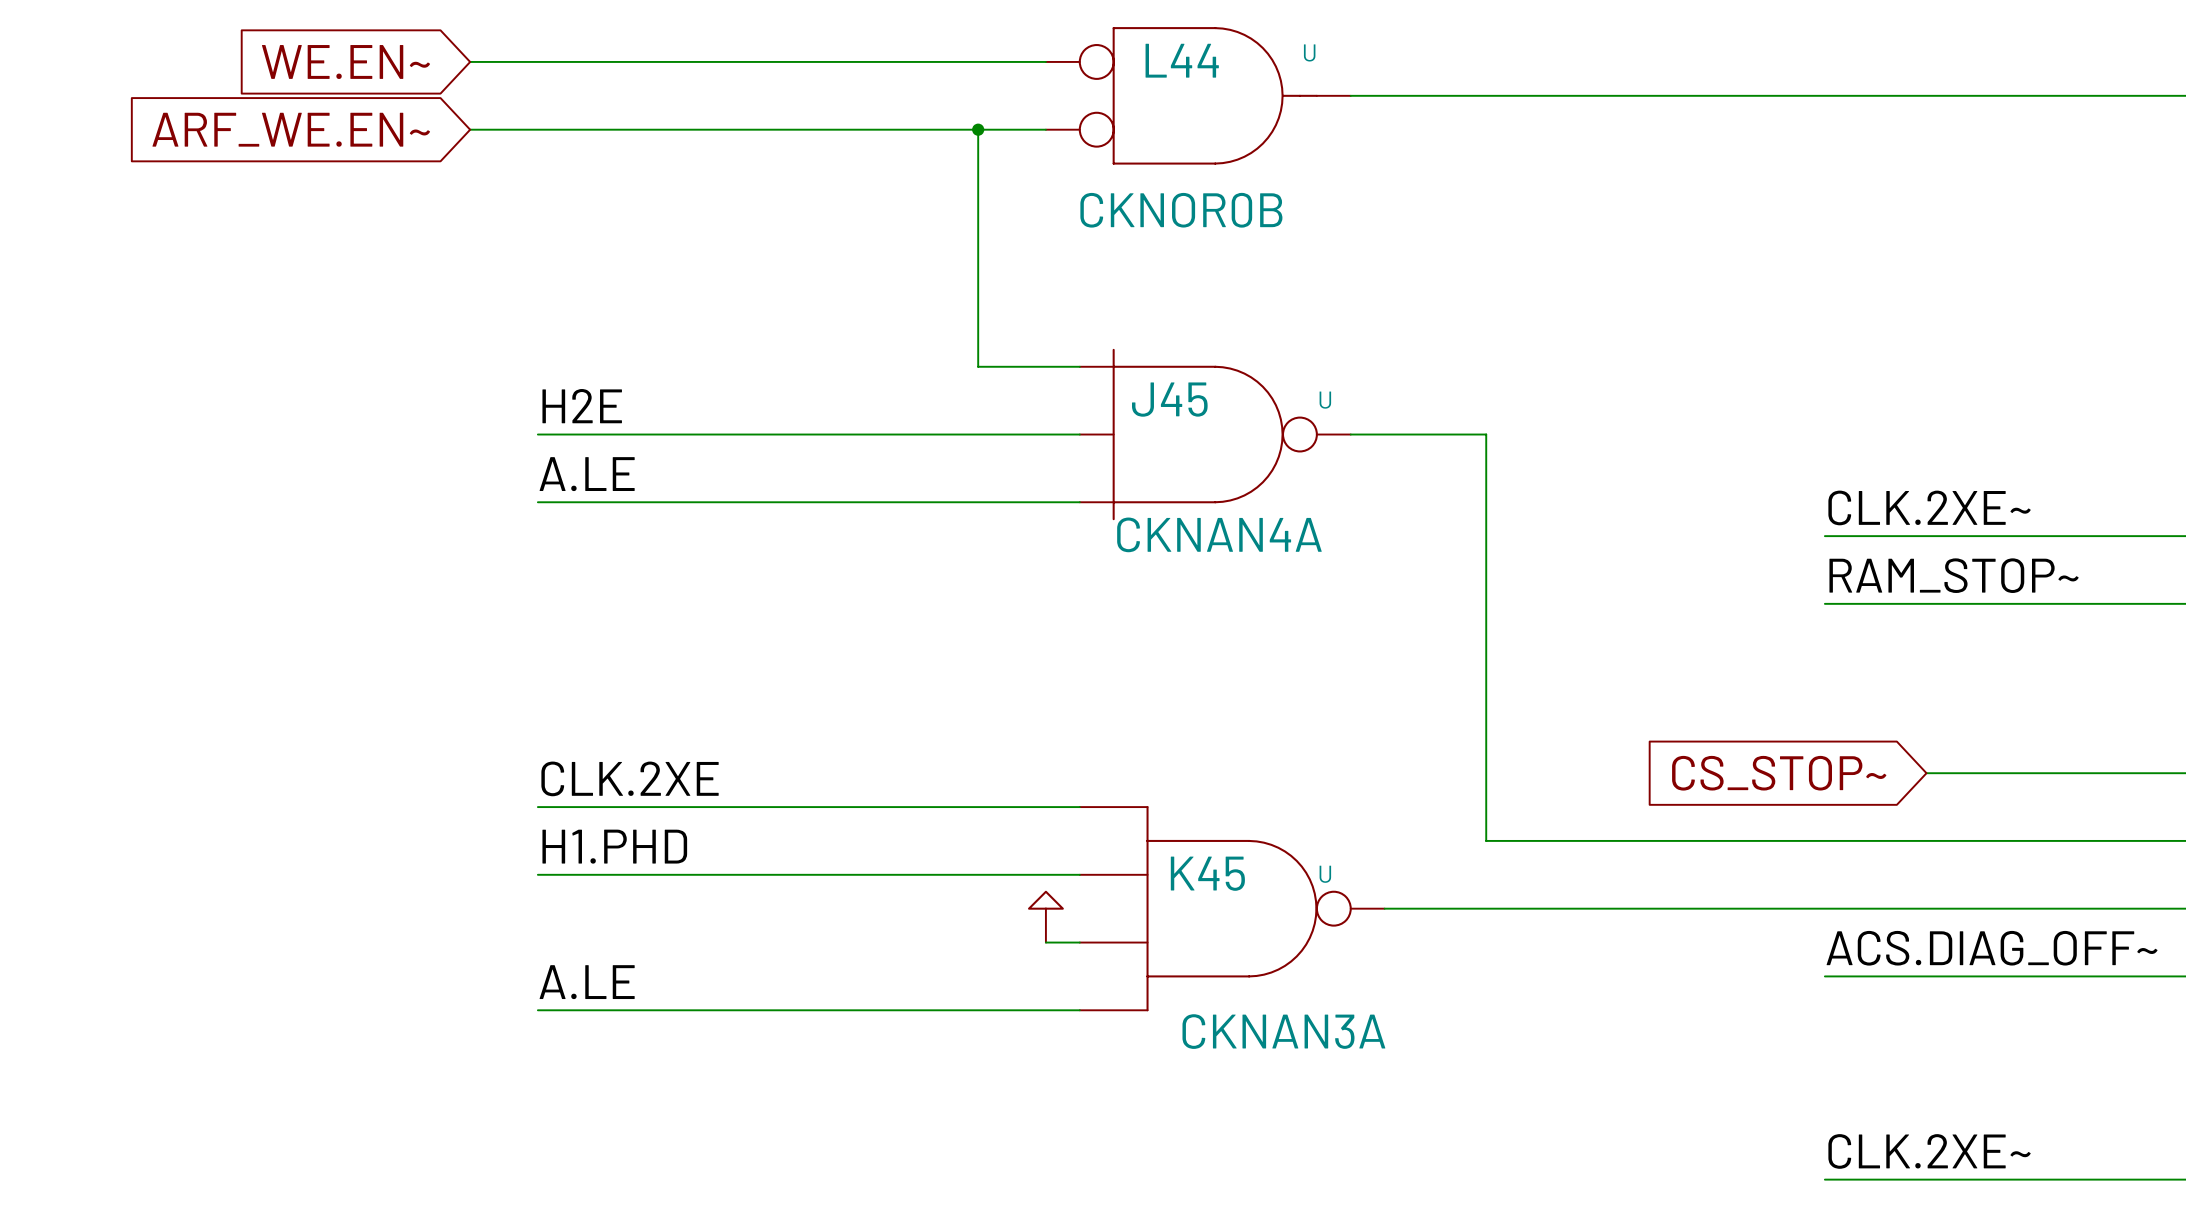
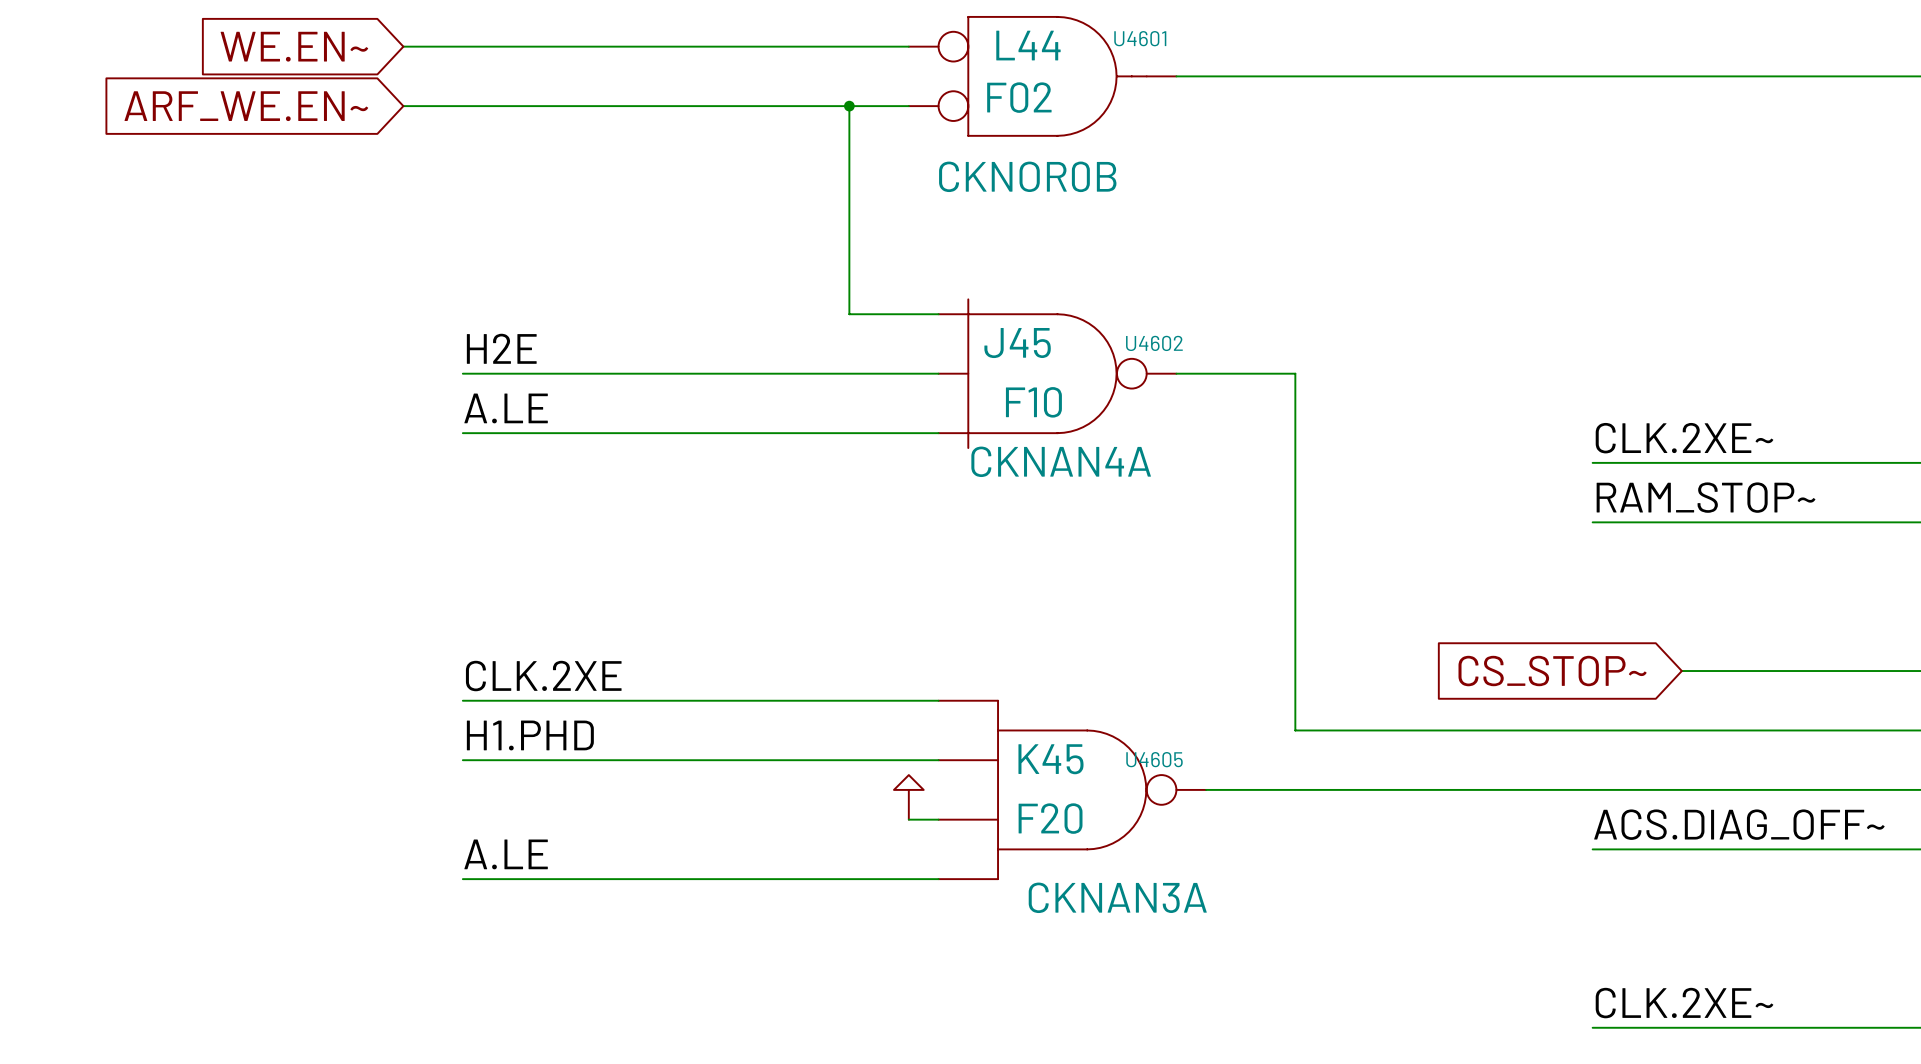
U name: U (1309, 52) -> U4601 (1140, 38)
U value: none -> F02 (1019, 97)
U name: U (1325, 400) -> U4602 (1154, 343)
U value: none -> F10 (1033, 402)
U name: U (1325, 874) -> U4605 (1154, 759)
U value: none -> F20 (1050, 818)

